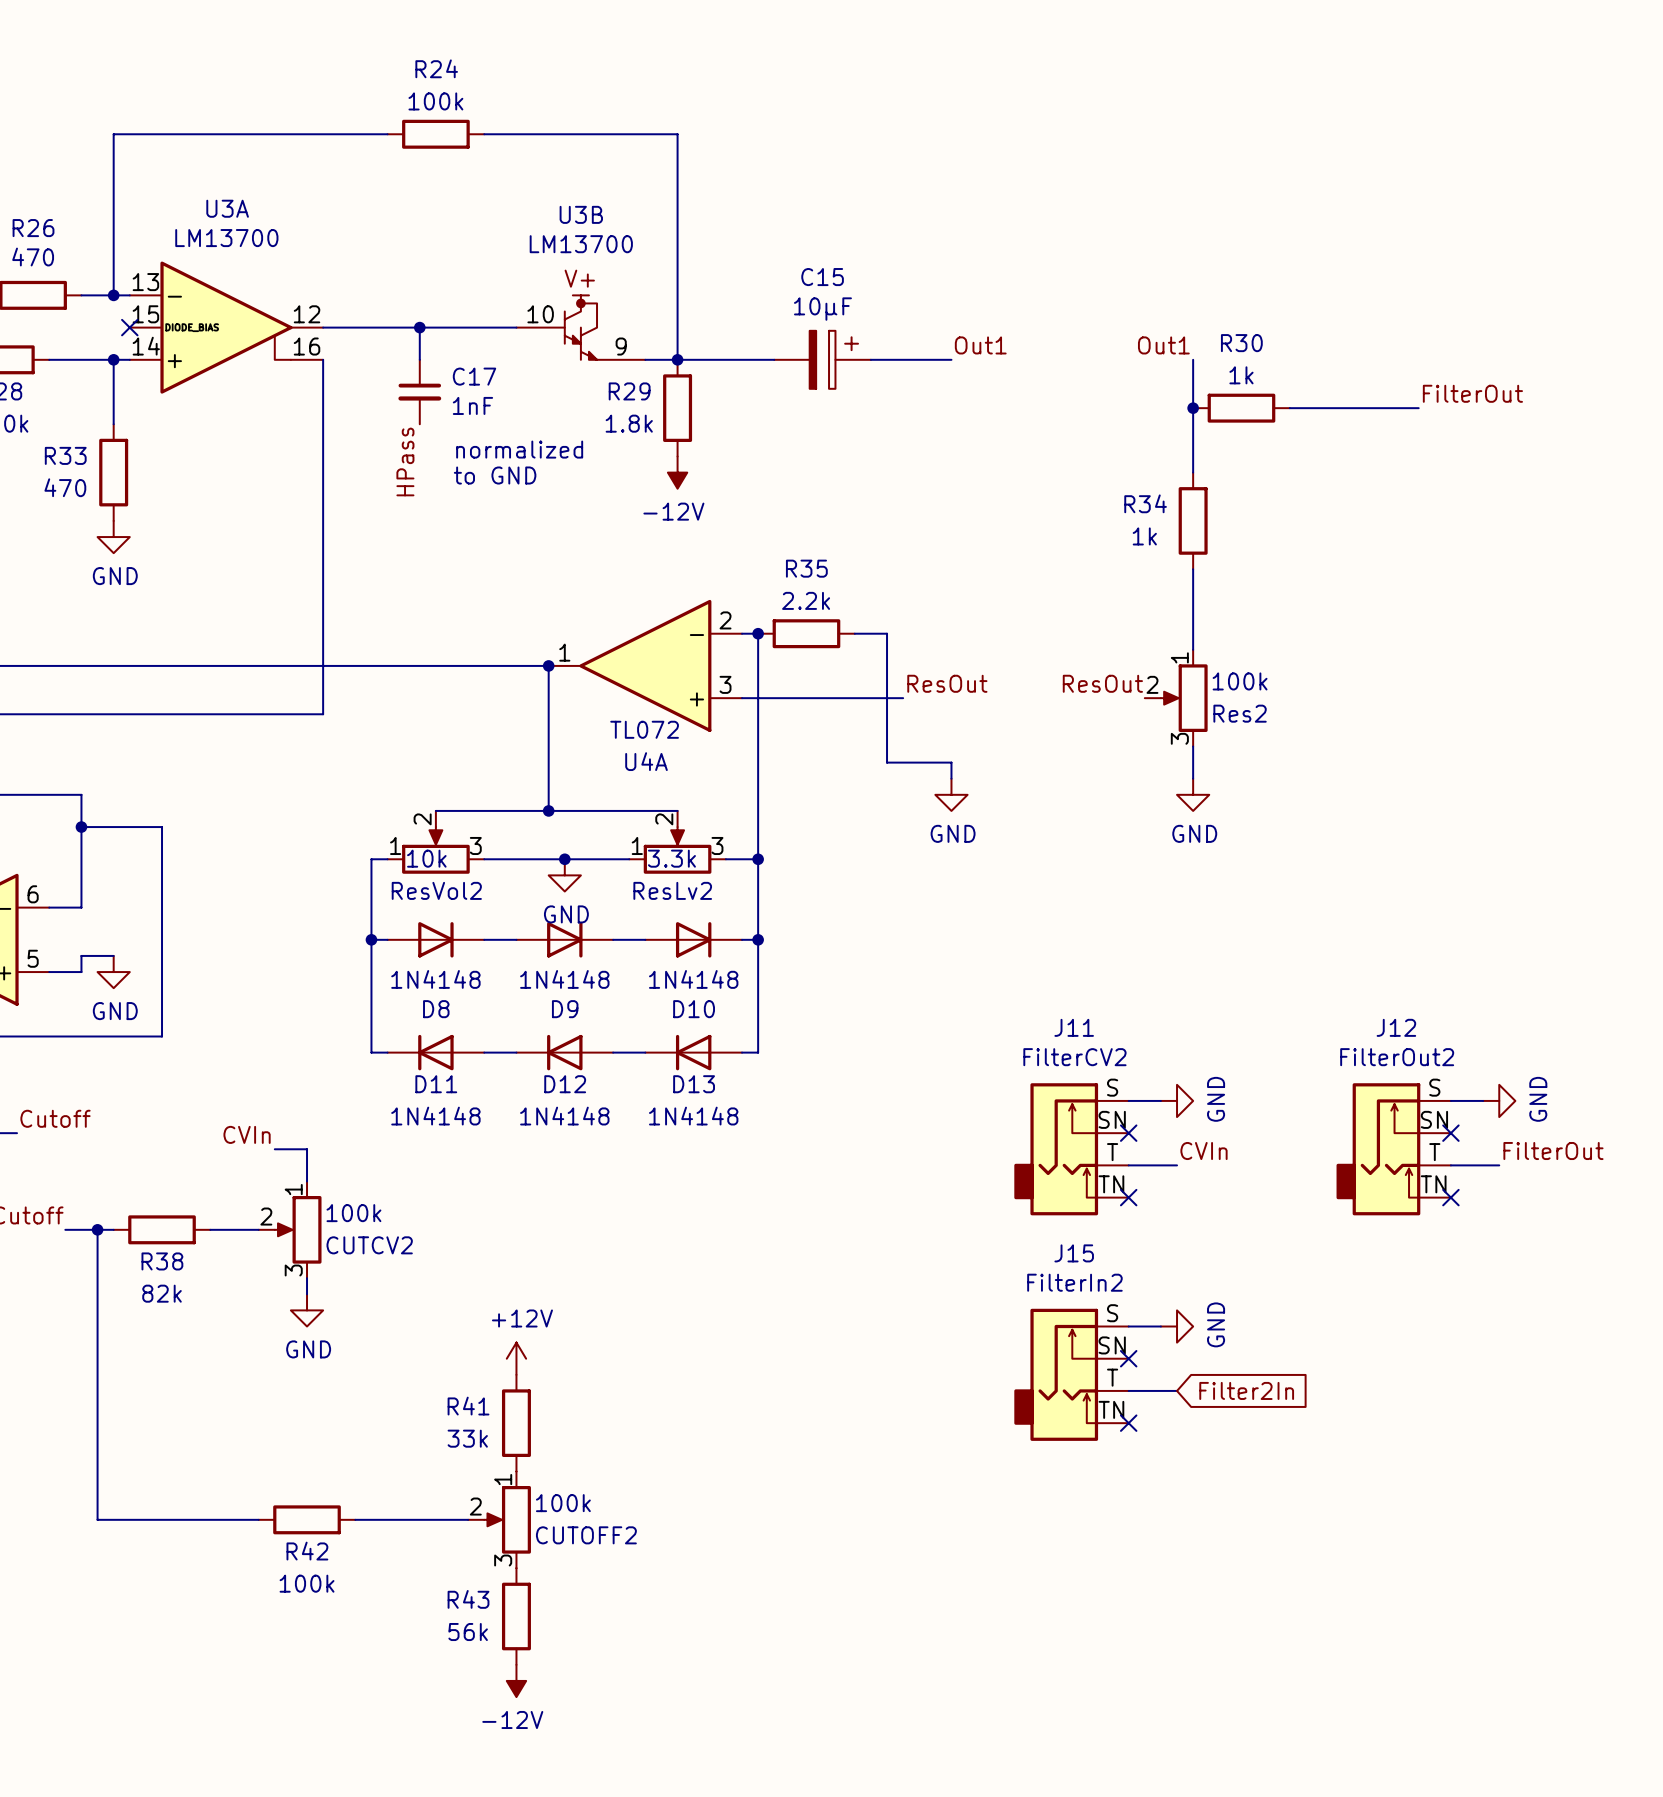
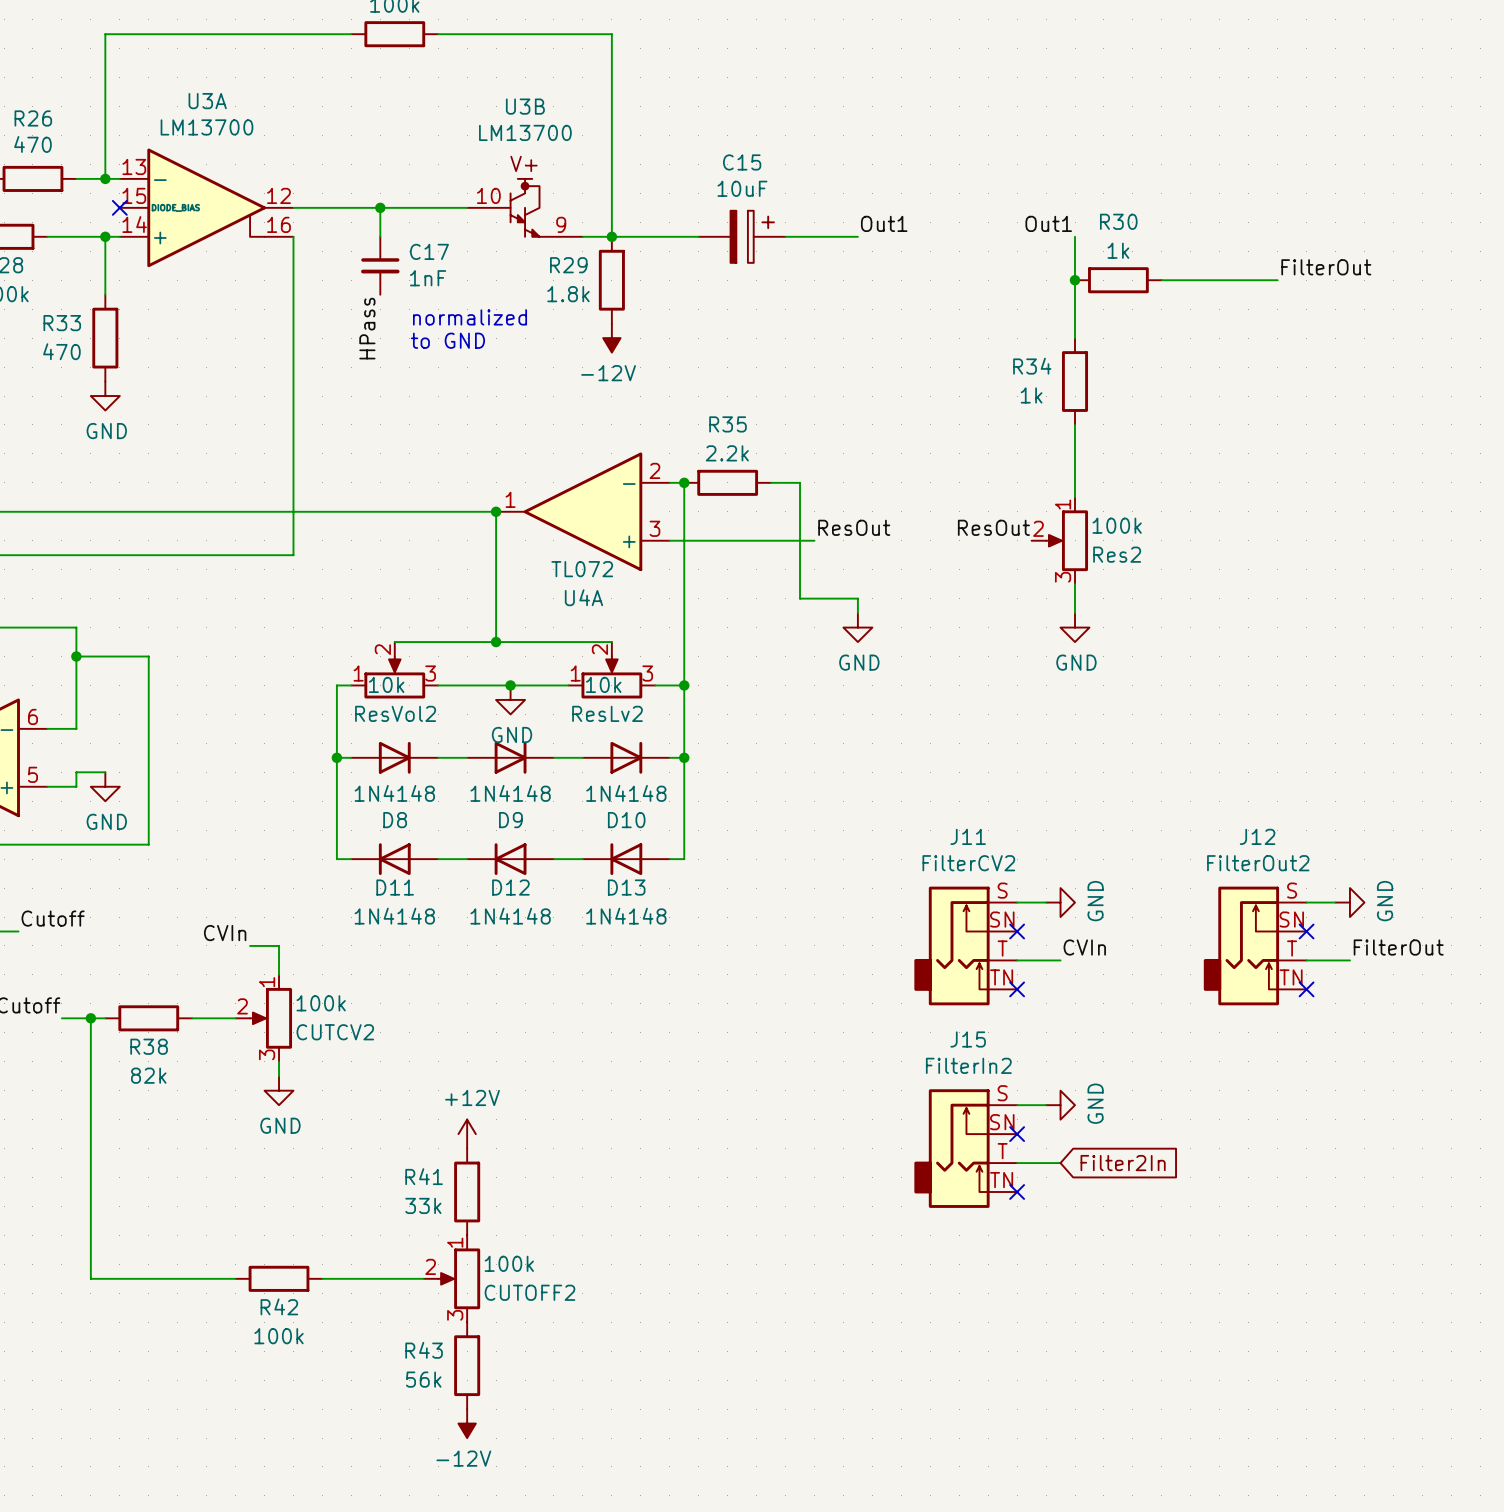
C15 value: 10µF (822, 309) -> 10uF (742, 188)
ResLv2 value: 3.3k (671, 858) -> 10k (603, 684)

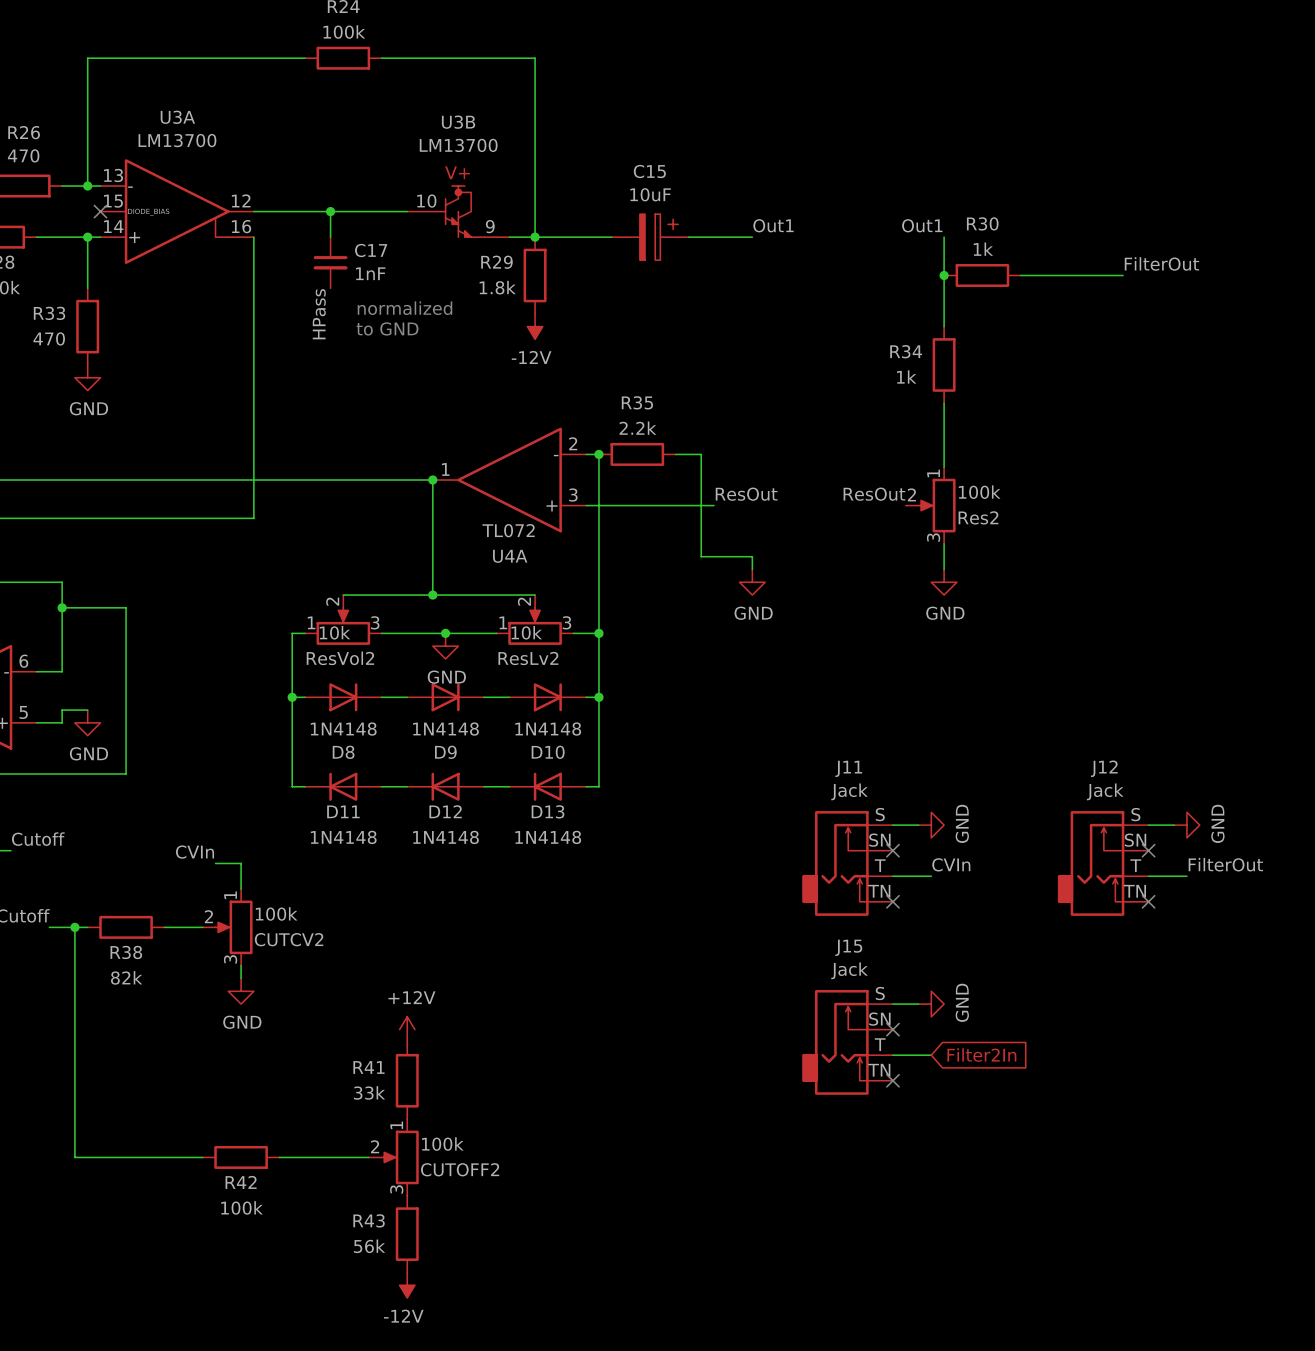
J11 value: FilterCV2 (968, 863) -> Jack (849, 791)
J12 value: FilterOut2 (1258, 863) -> Jack (1105, 791)
J15 value: FilterIn2 (968, 1065) -> Jack (849, 970)

